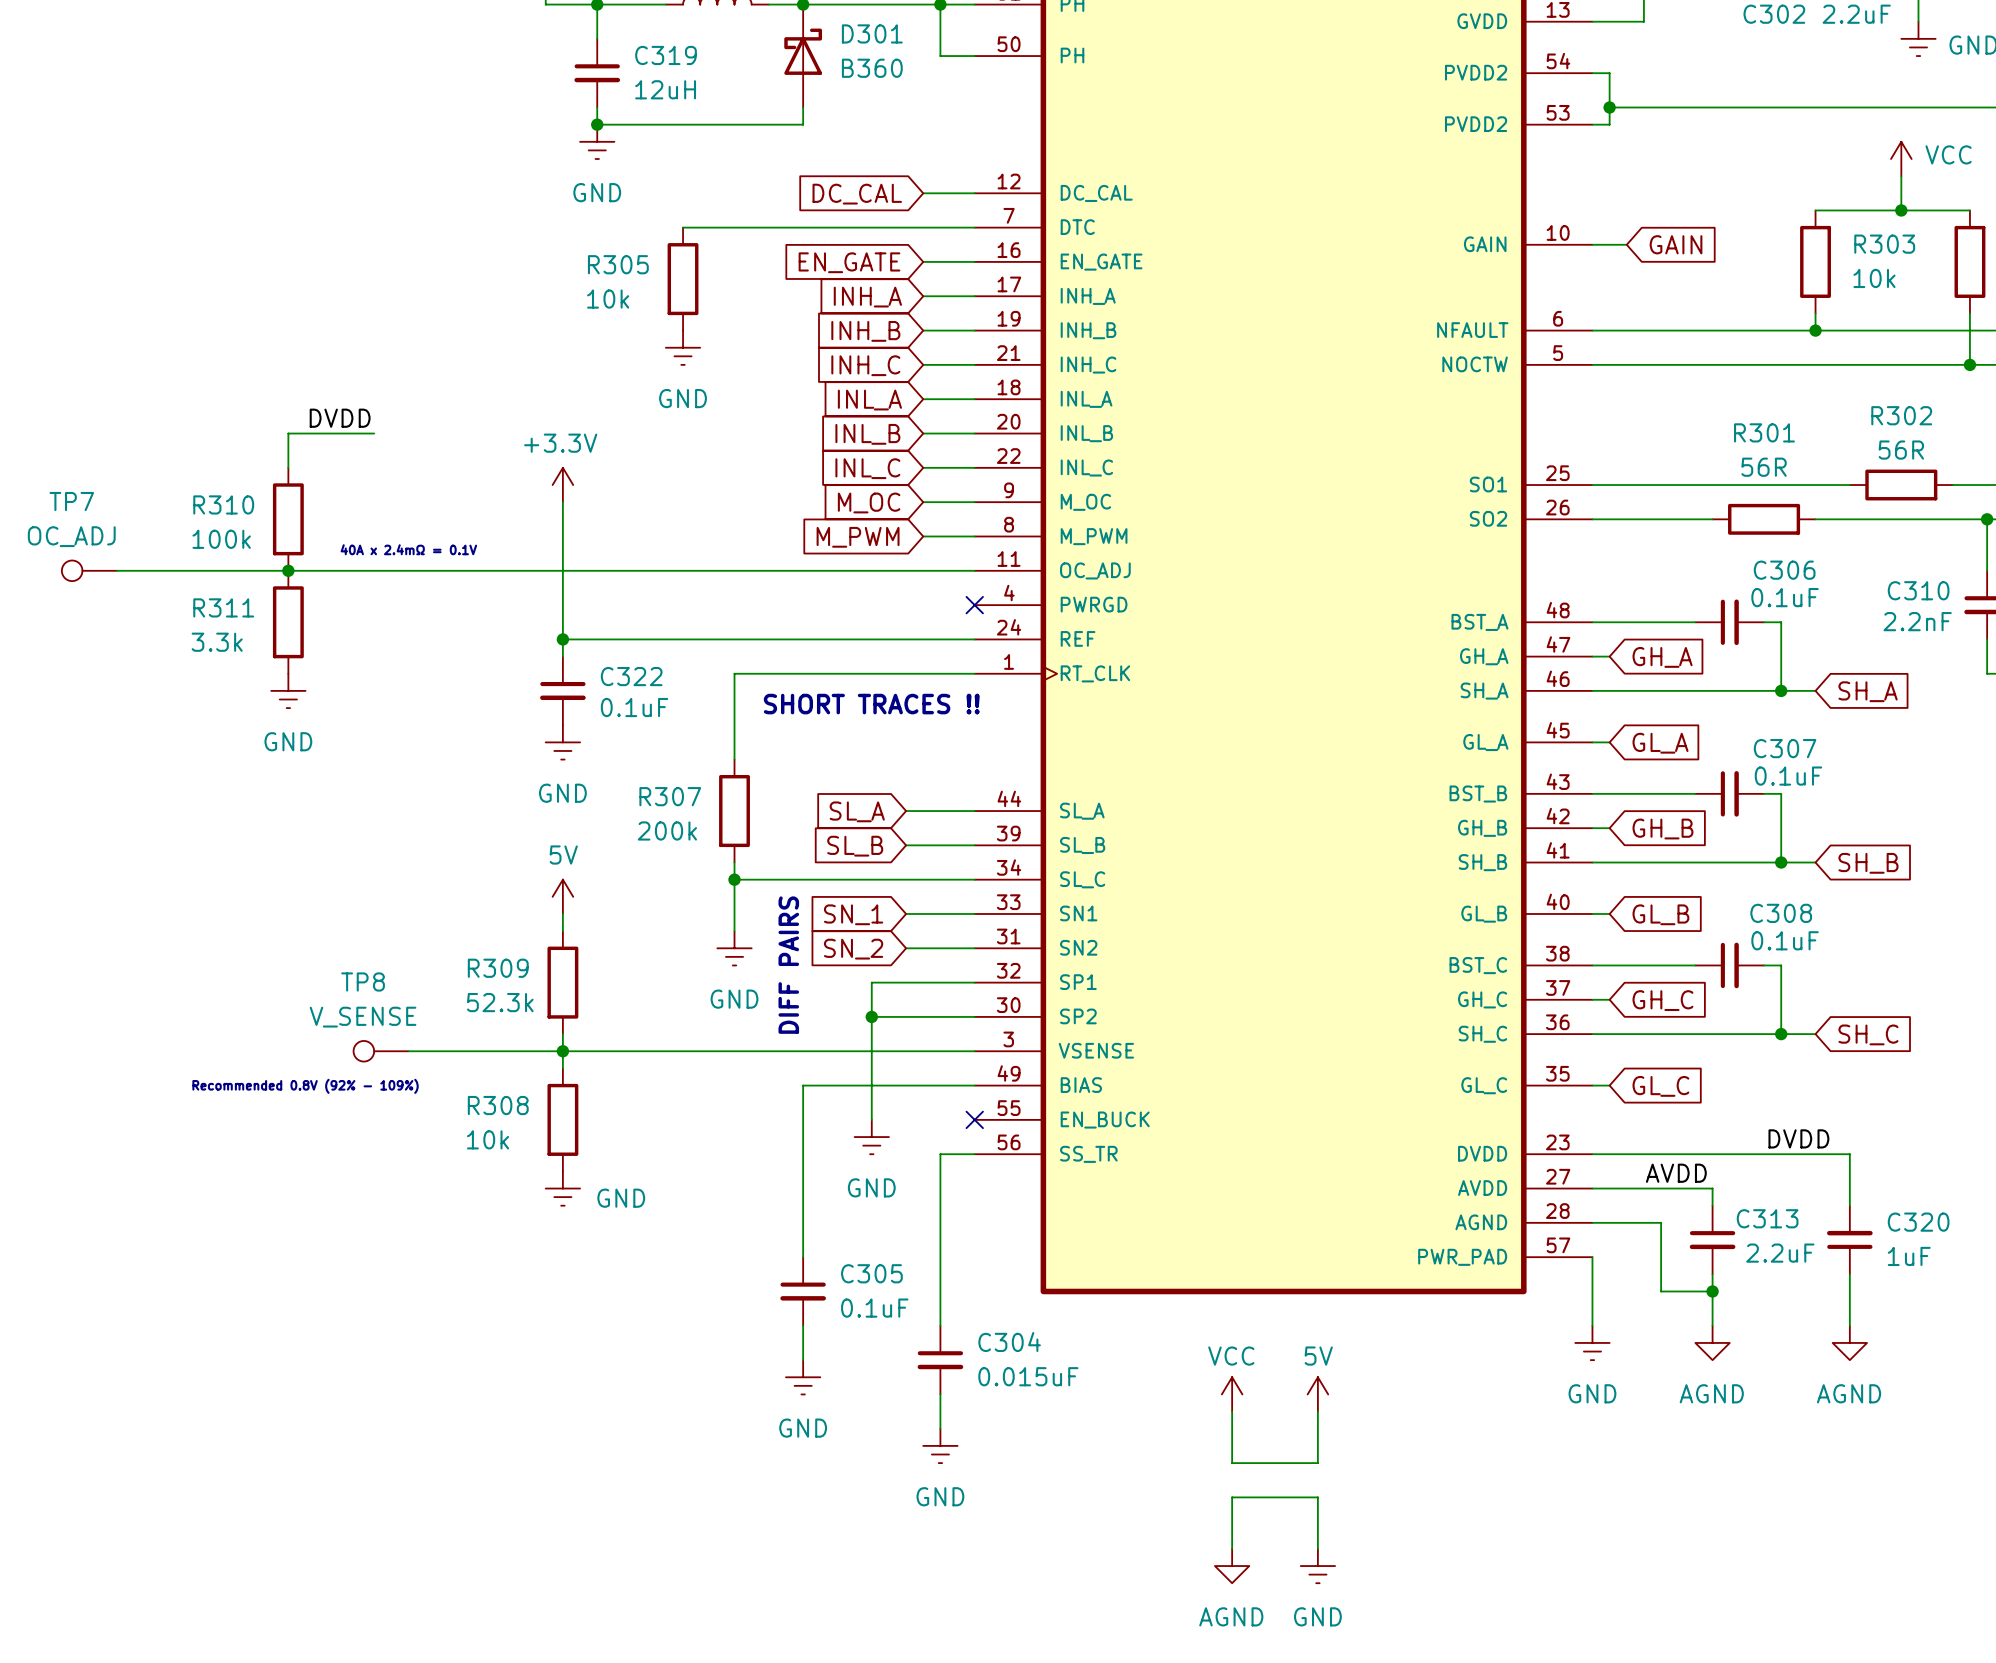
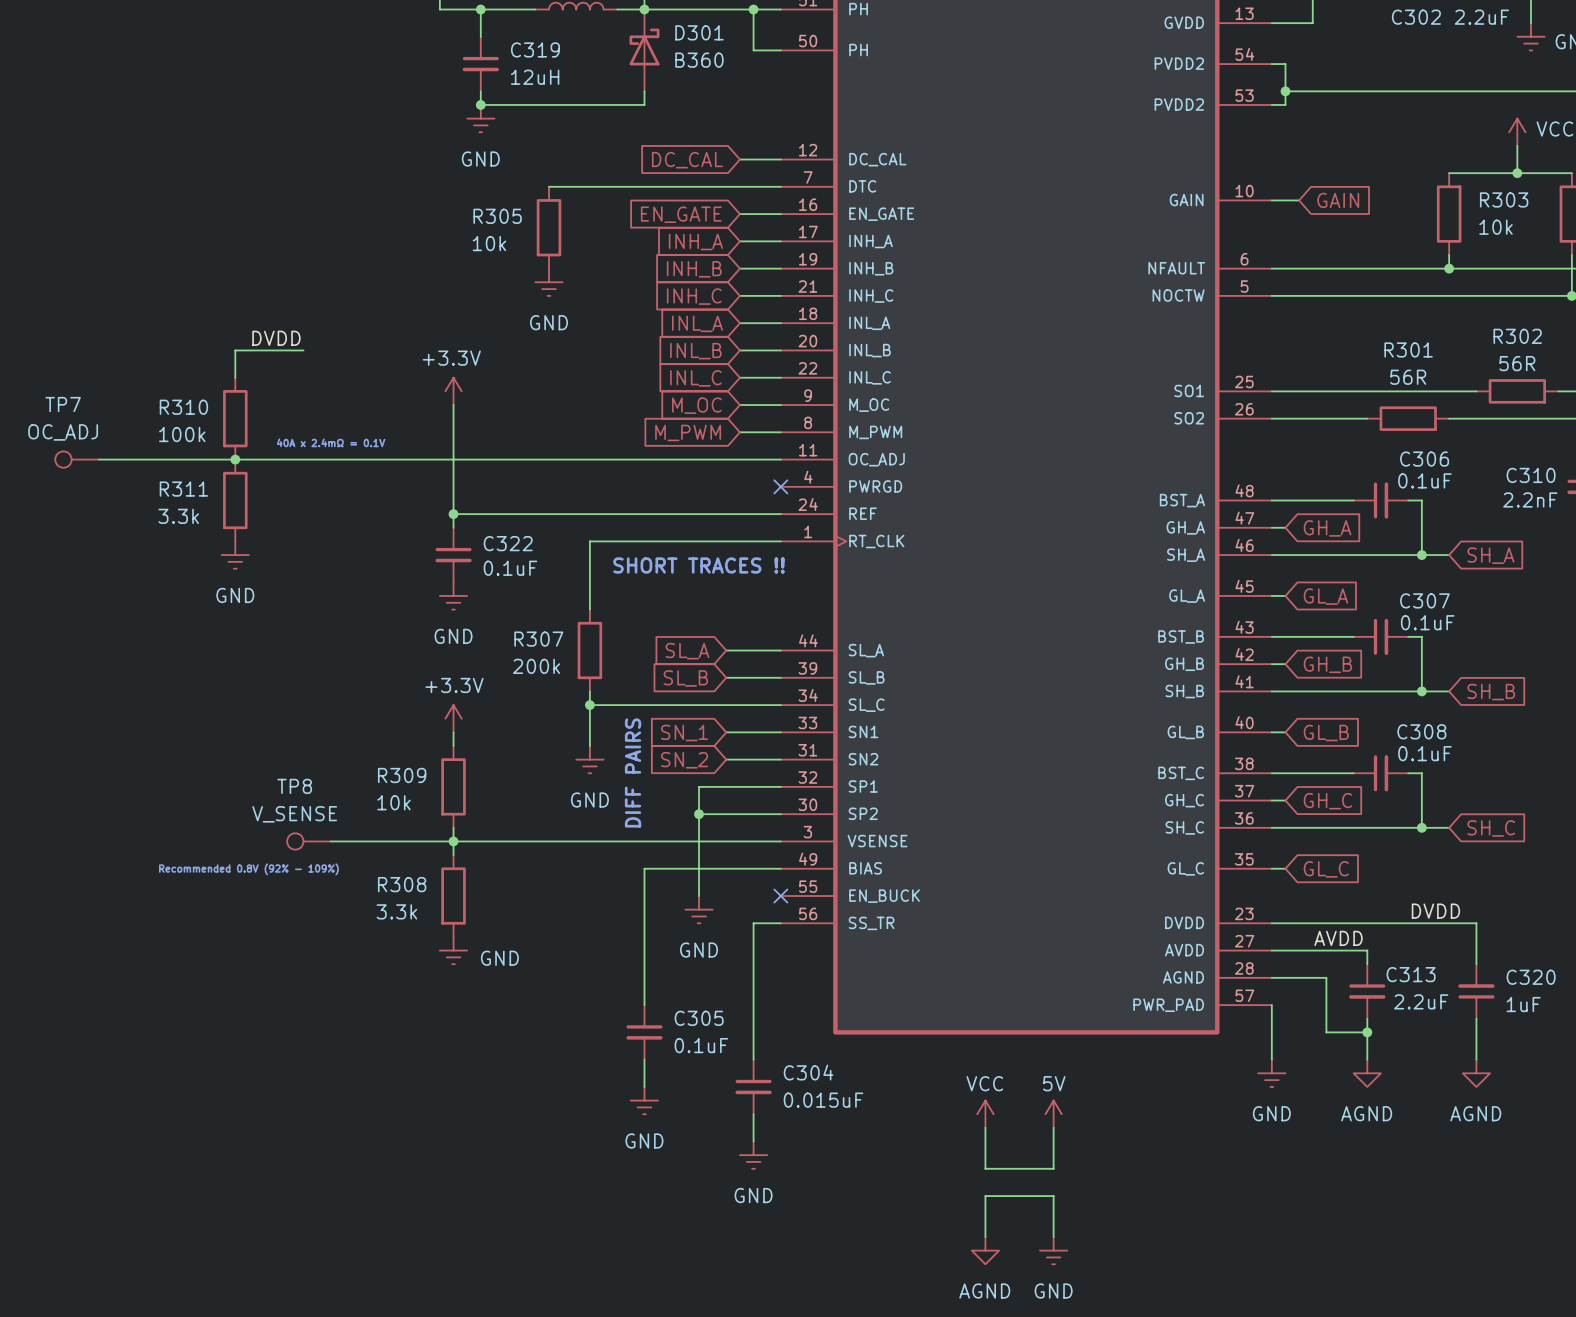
power symbol: 5V (562, 896) -> +3.3V (453, 718)
R309 value: 52.3k (500, 1002) -> 10k (394, 802)
R308 value: 10k (488, 1139) -> 3.3k (396, 911)

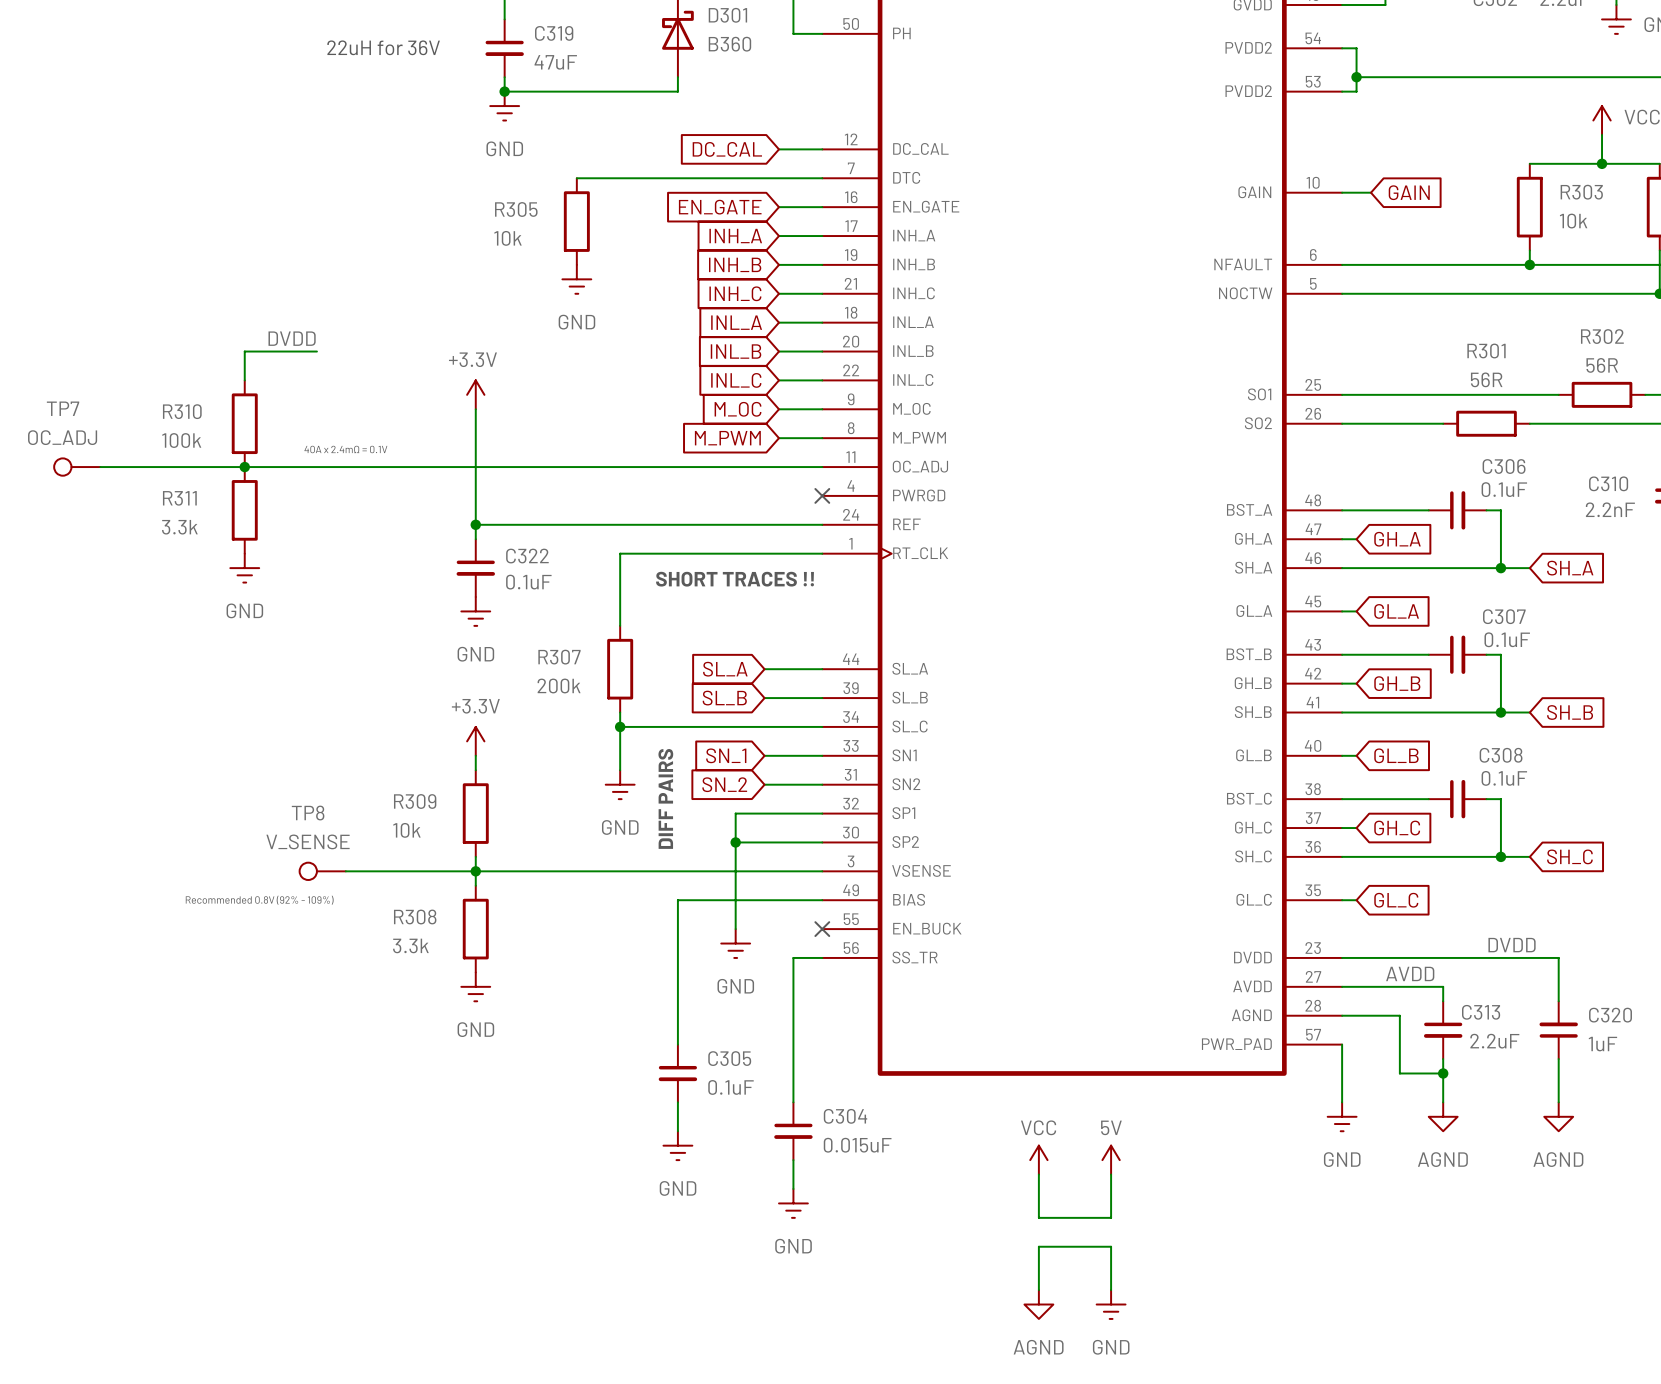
text: none -> 22uH for 36V (383, 47)
C319 value: 12uH (535, 77) -> 47uF (555, 62)
power symbol text position: GND (499, 958) -> GND (475, 1029)

